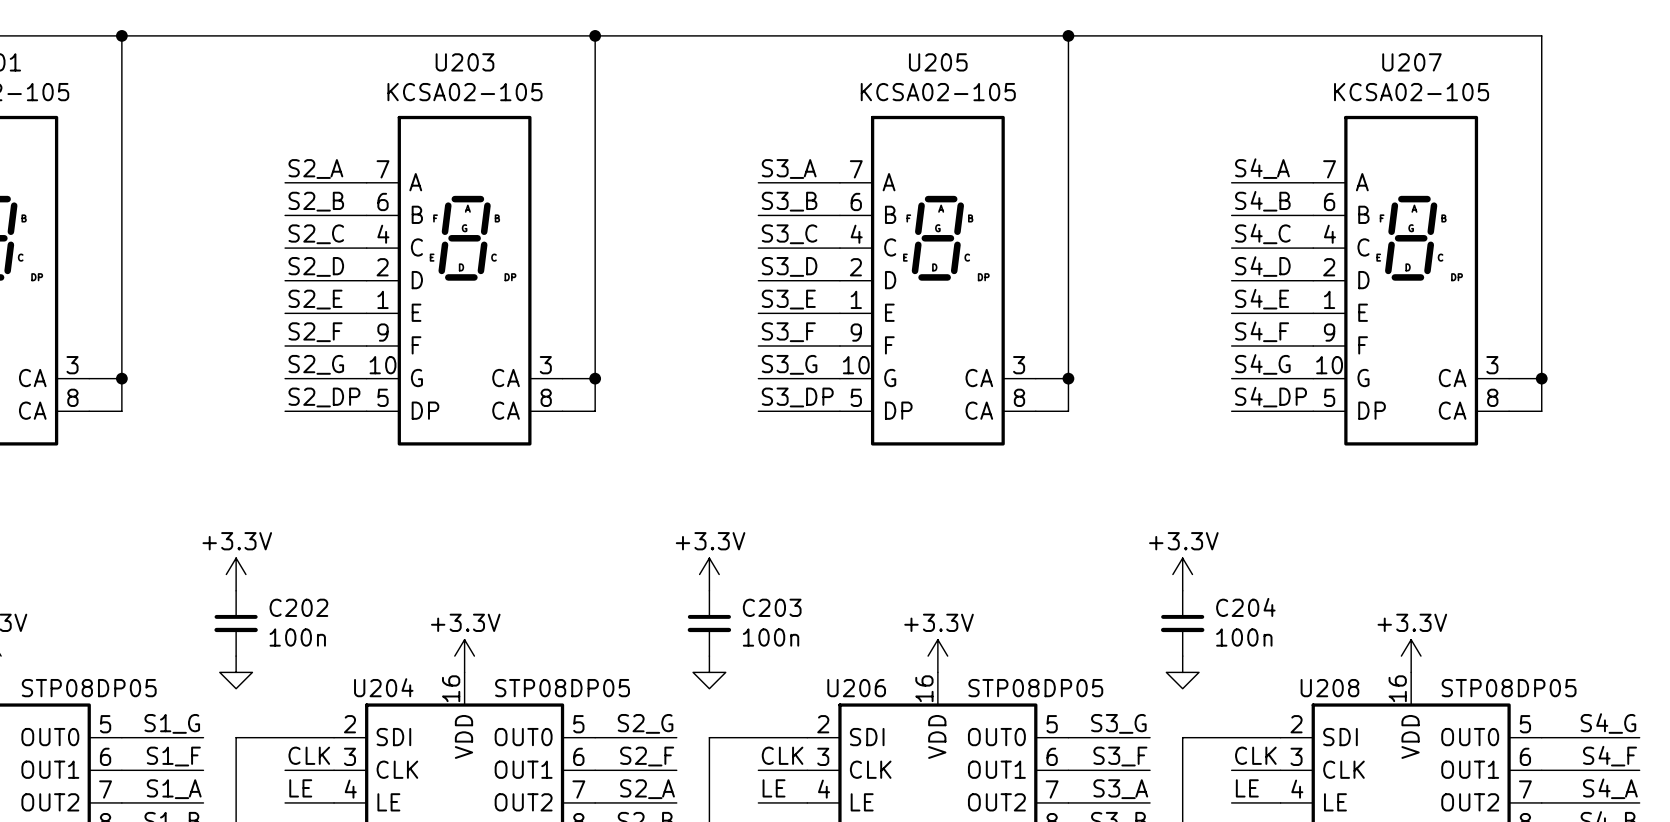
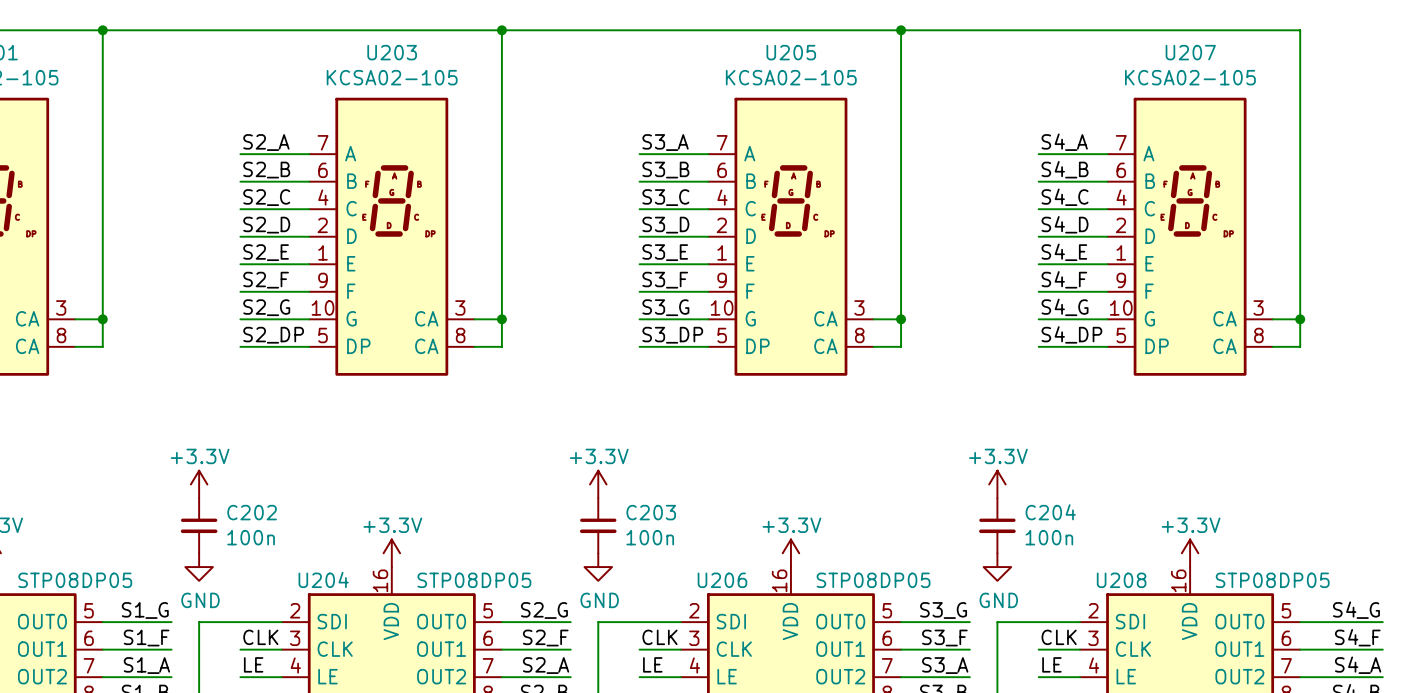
power symbol text: none -> GND (200, 600)
power symbol text: none -> GND (599, 600)
power symbol text: none -> GND (998, 600)

